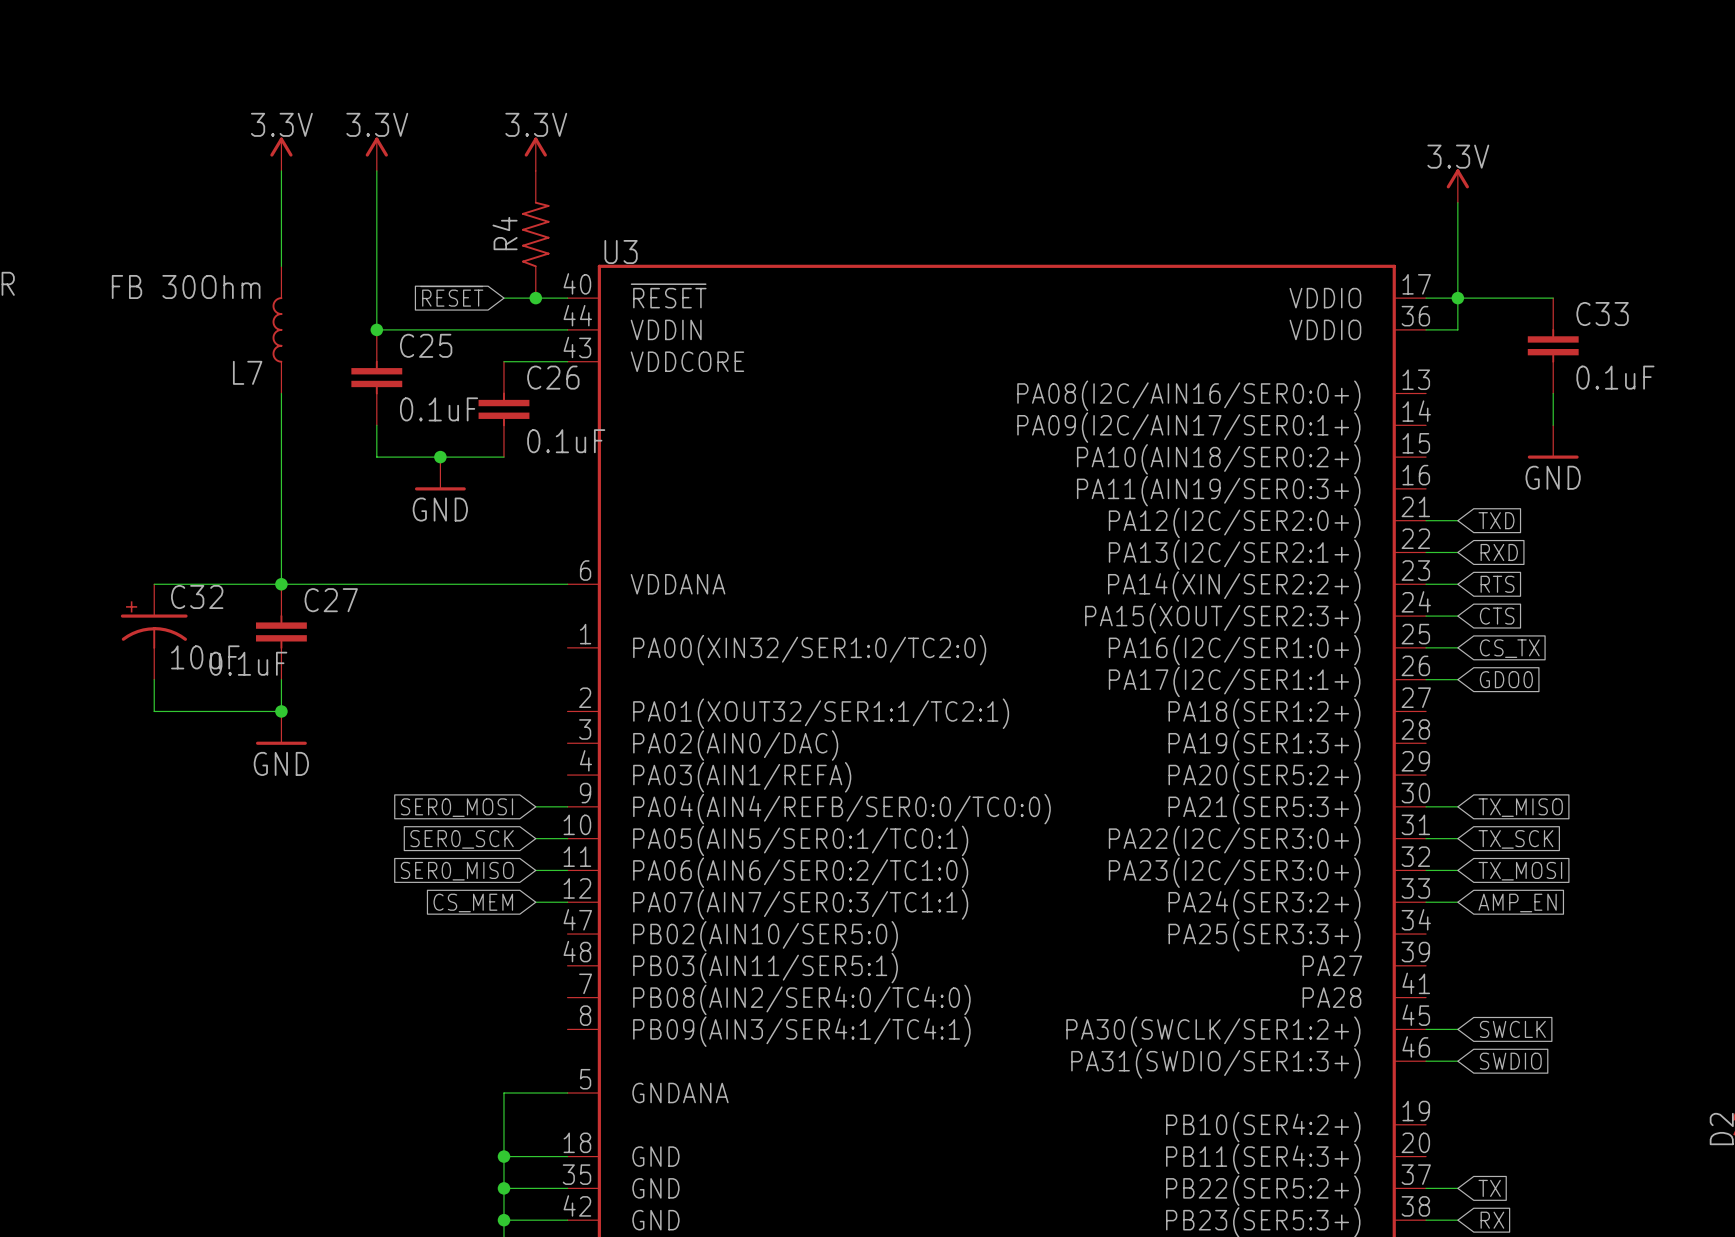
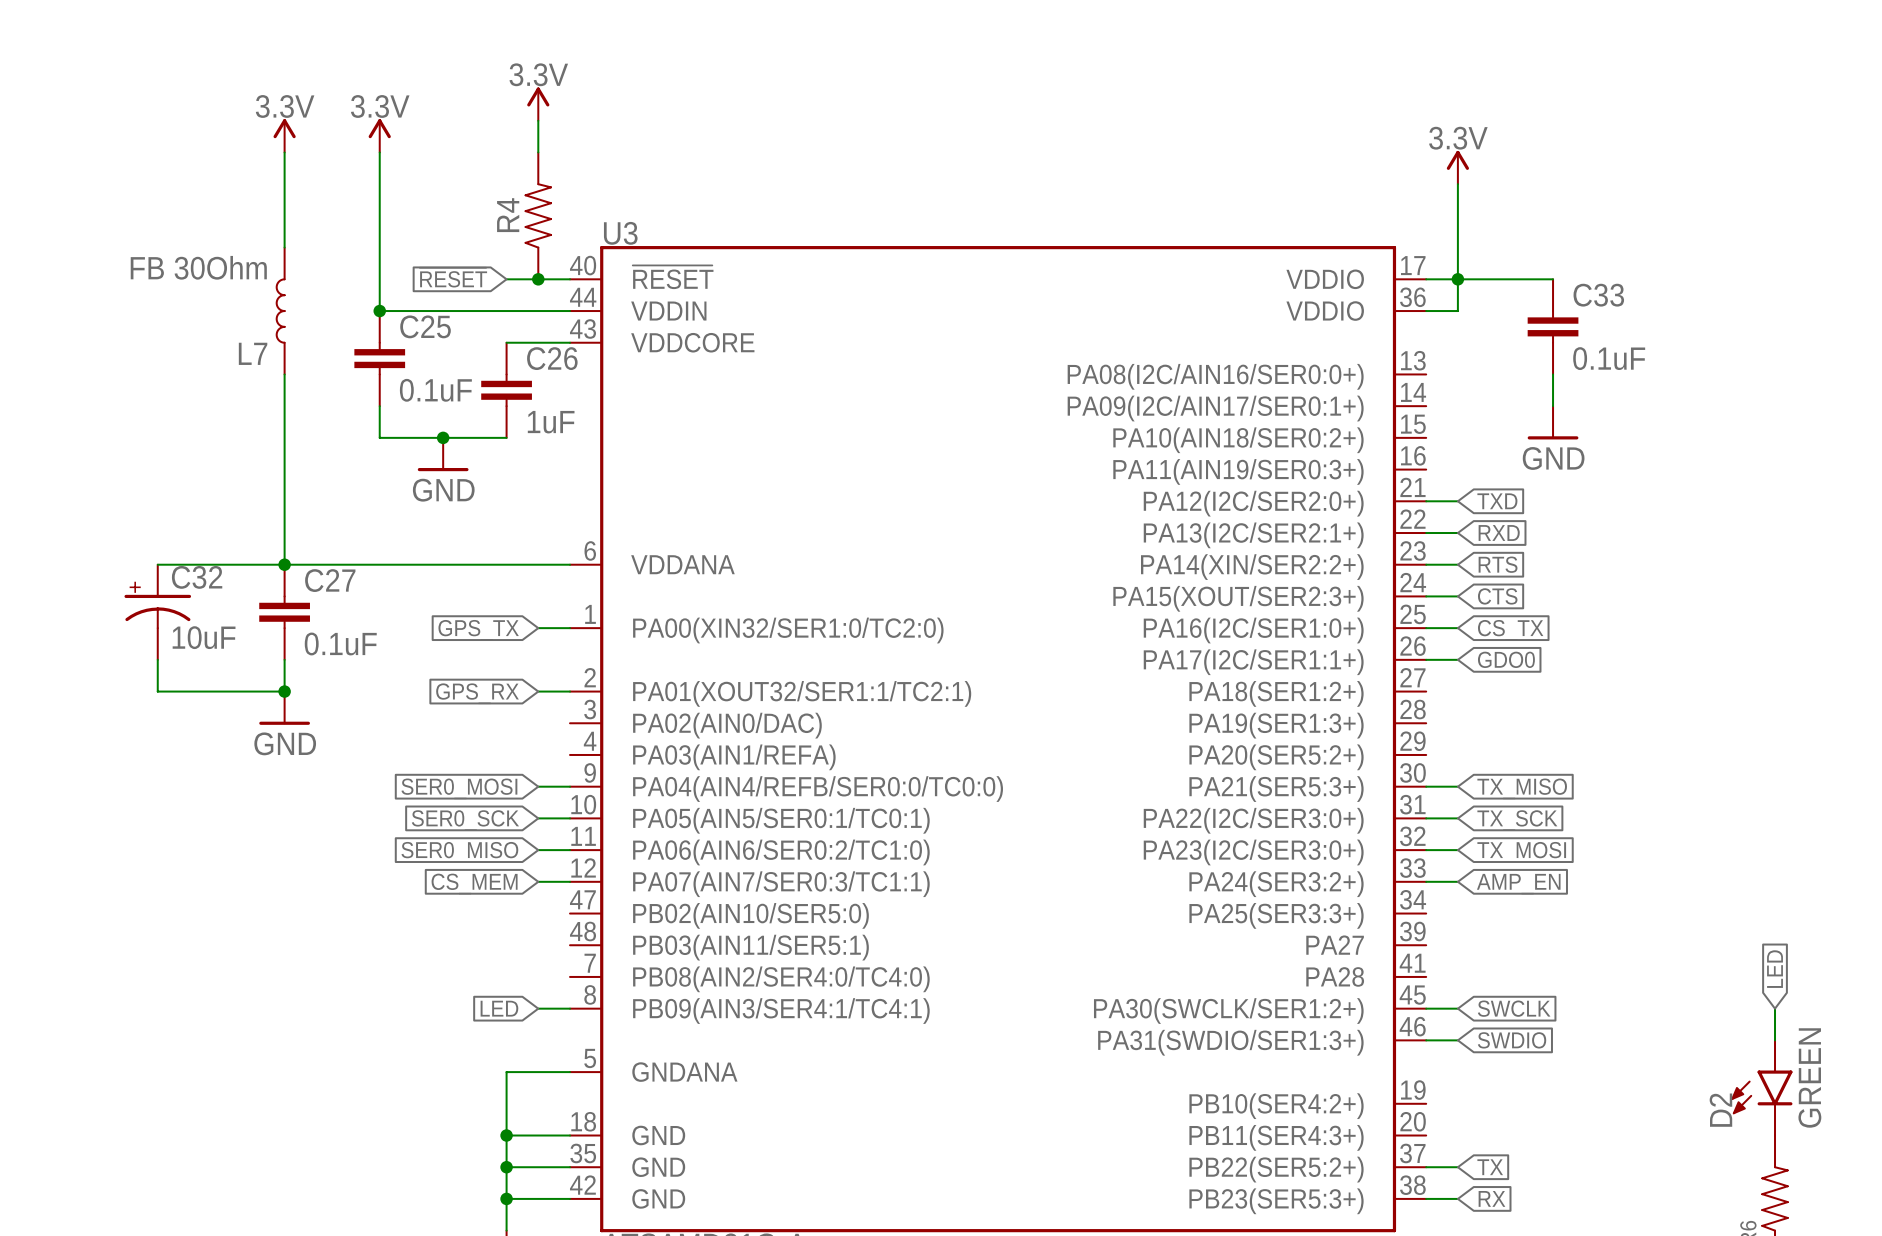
power symbol position: 3.3V (535, 154) -> 3.3V (538, 104)
C26 value: 0.1uF (566, 441) -> 1uF (551, 422)
wire: none -> (538, 628) (570, 628)
global label: none -> GPS_TX (478, 630)
C27 value position: 0.1uF (248, 663) -> 0.1uF (340, 643)
wire: none -> (538, 691) (570, 691)
global label: none -> GPS_RX (477, 693)
global label: none -> LED (499, 1008)
wire: none -> (538, 1008) (570, 1008)

